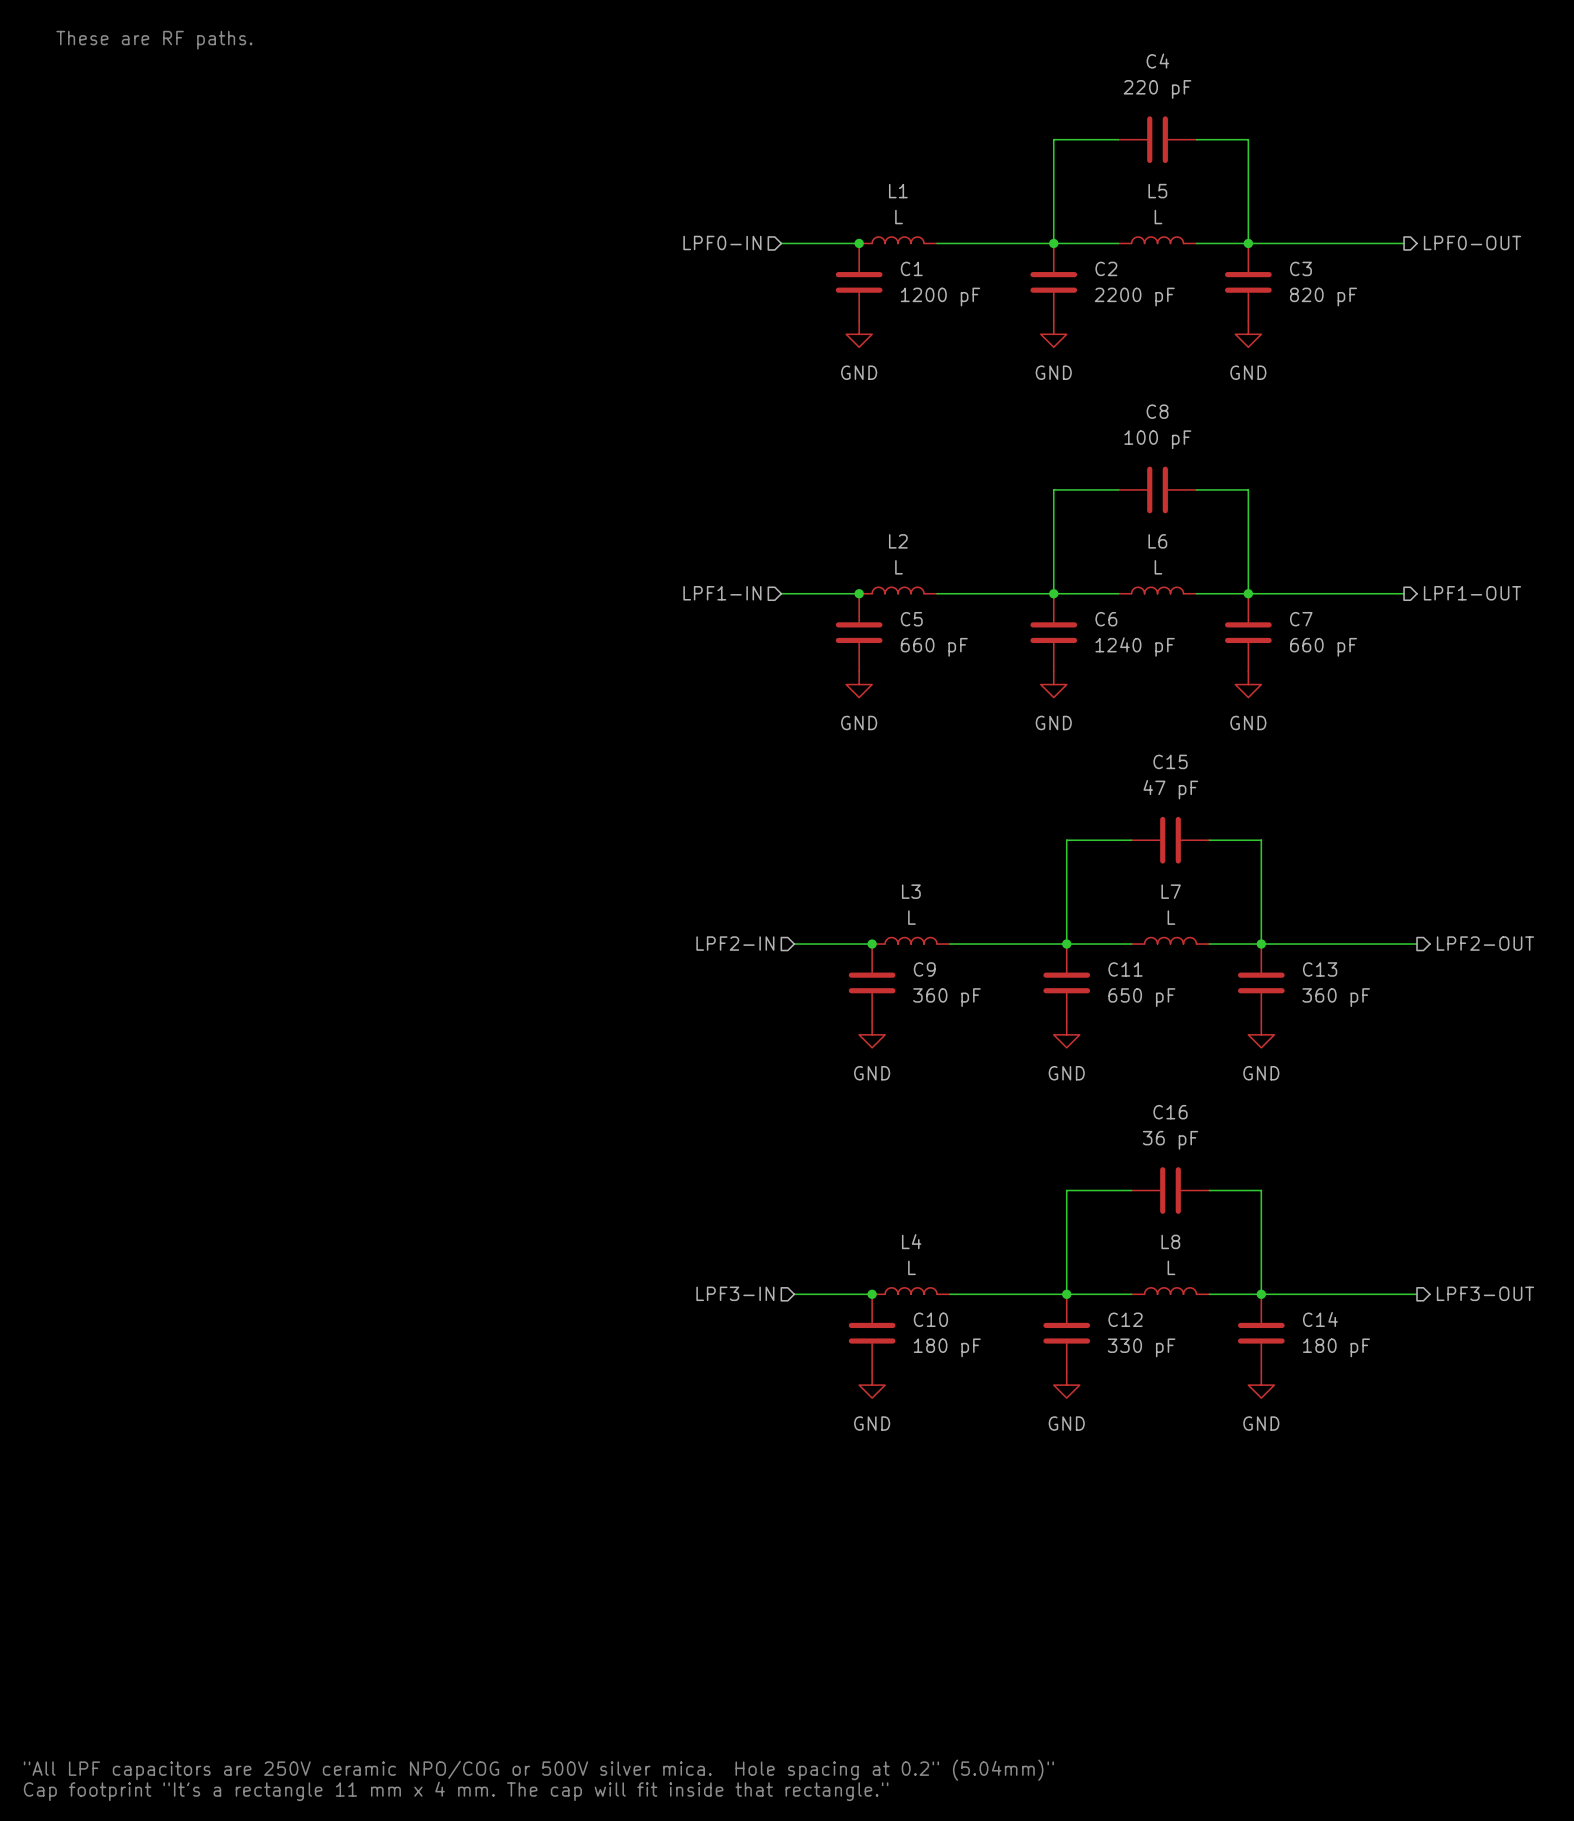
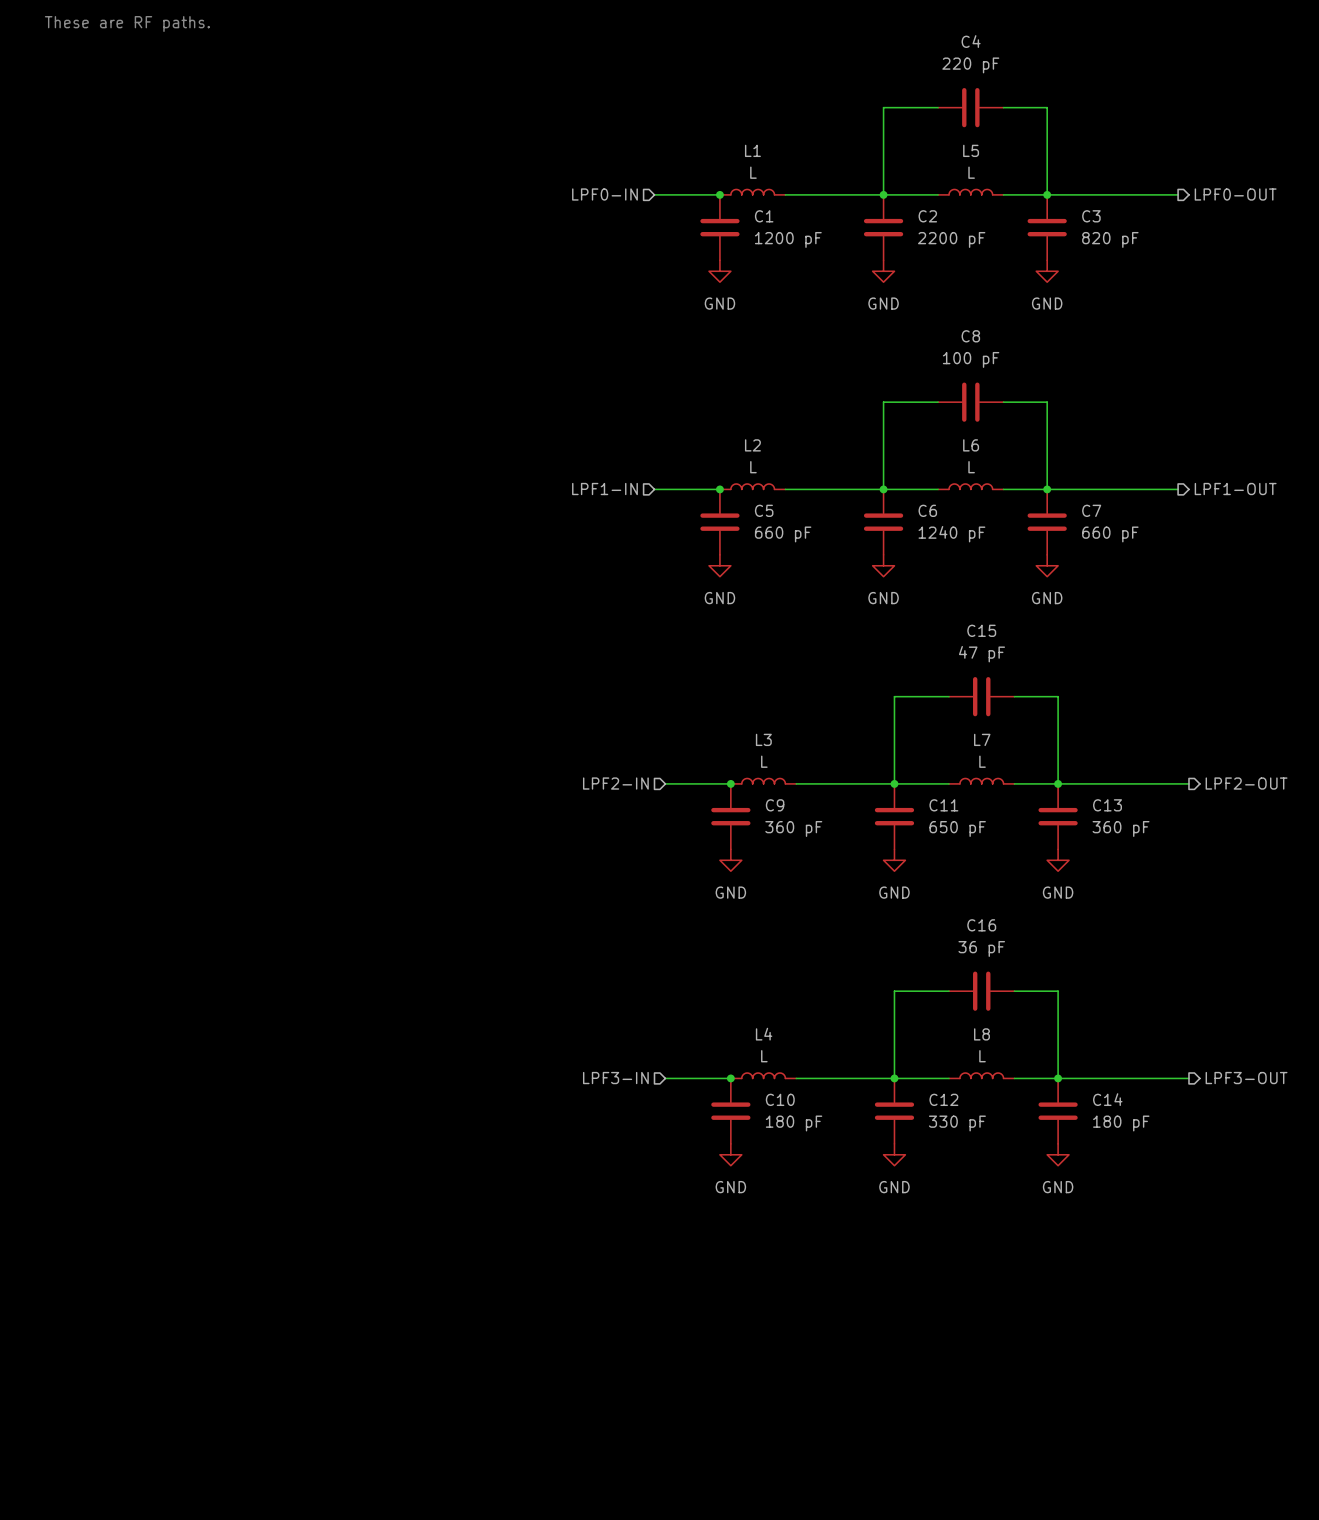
text: "All LPF capacitors are 250V ceramic NPO/COG or 500V silver mica. Hole spacing at 0.2" (5.04mm)" (538, 1770) -> none
text: Cap footprint "It's a rectangle 11 mm x 4 mm. The cap will fit inside that rectangle." (456, 1791) -> none

